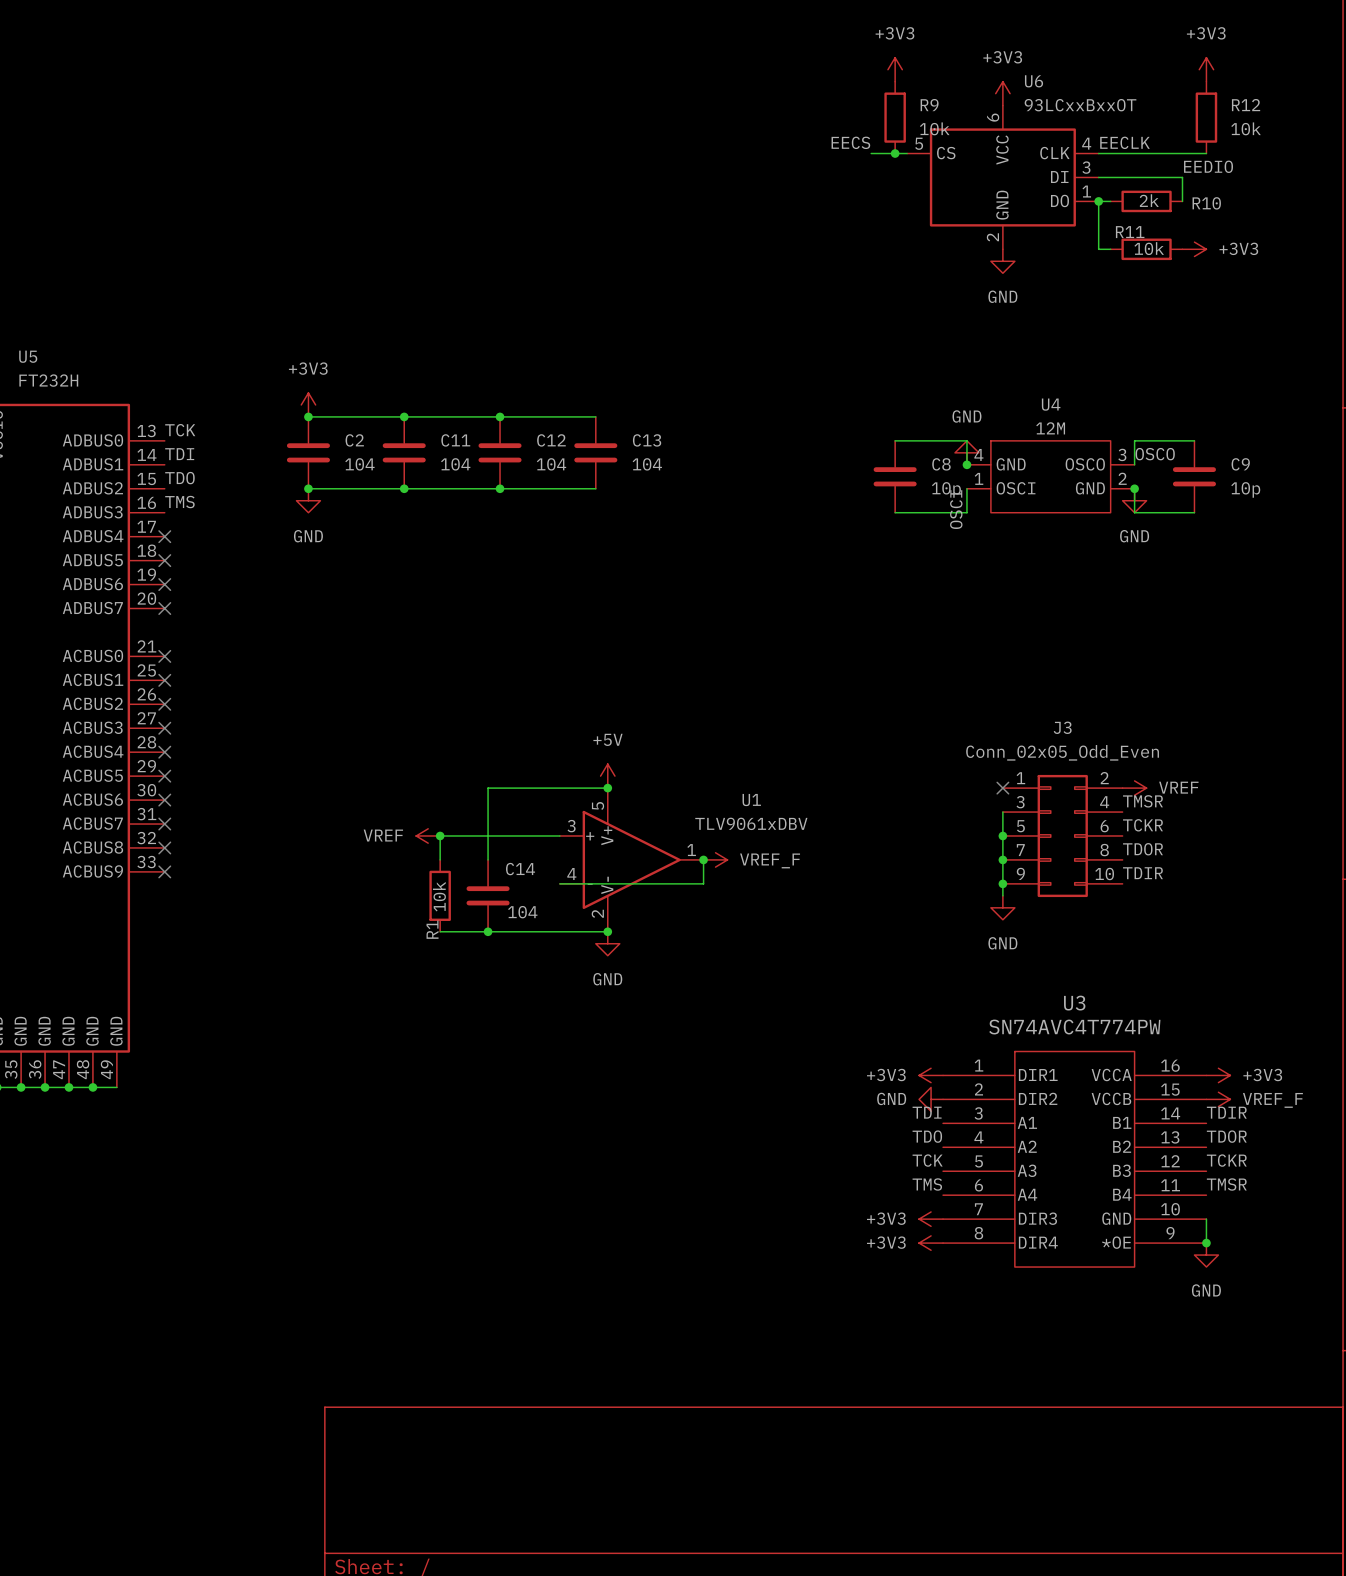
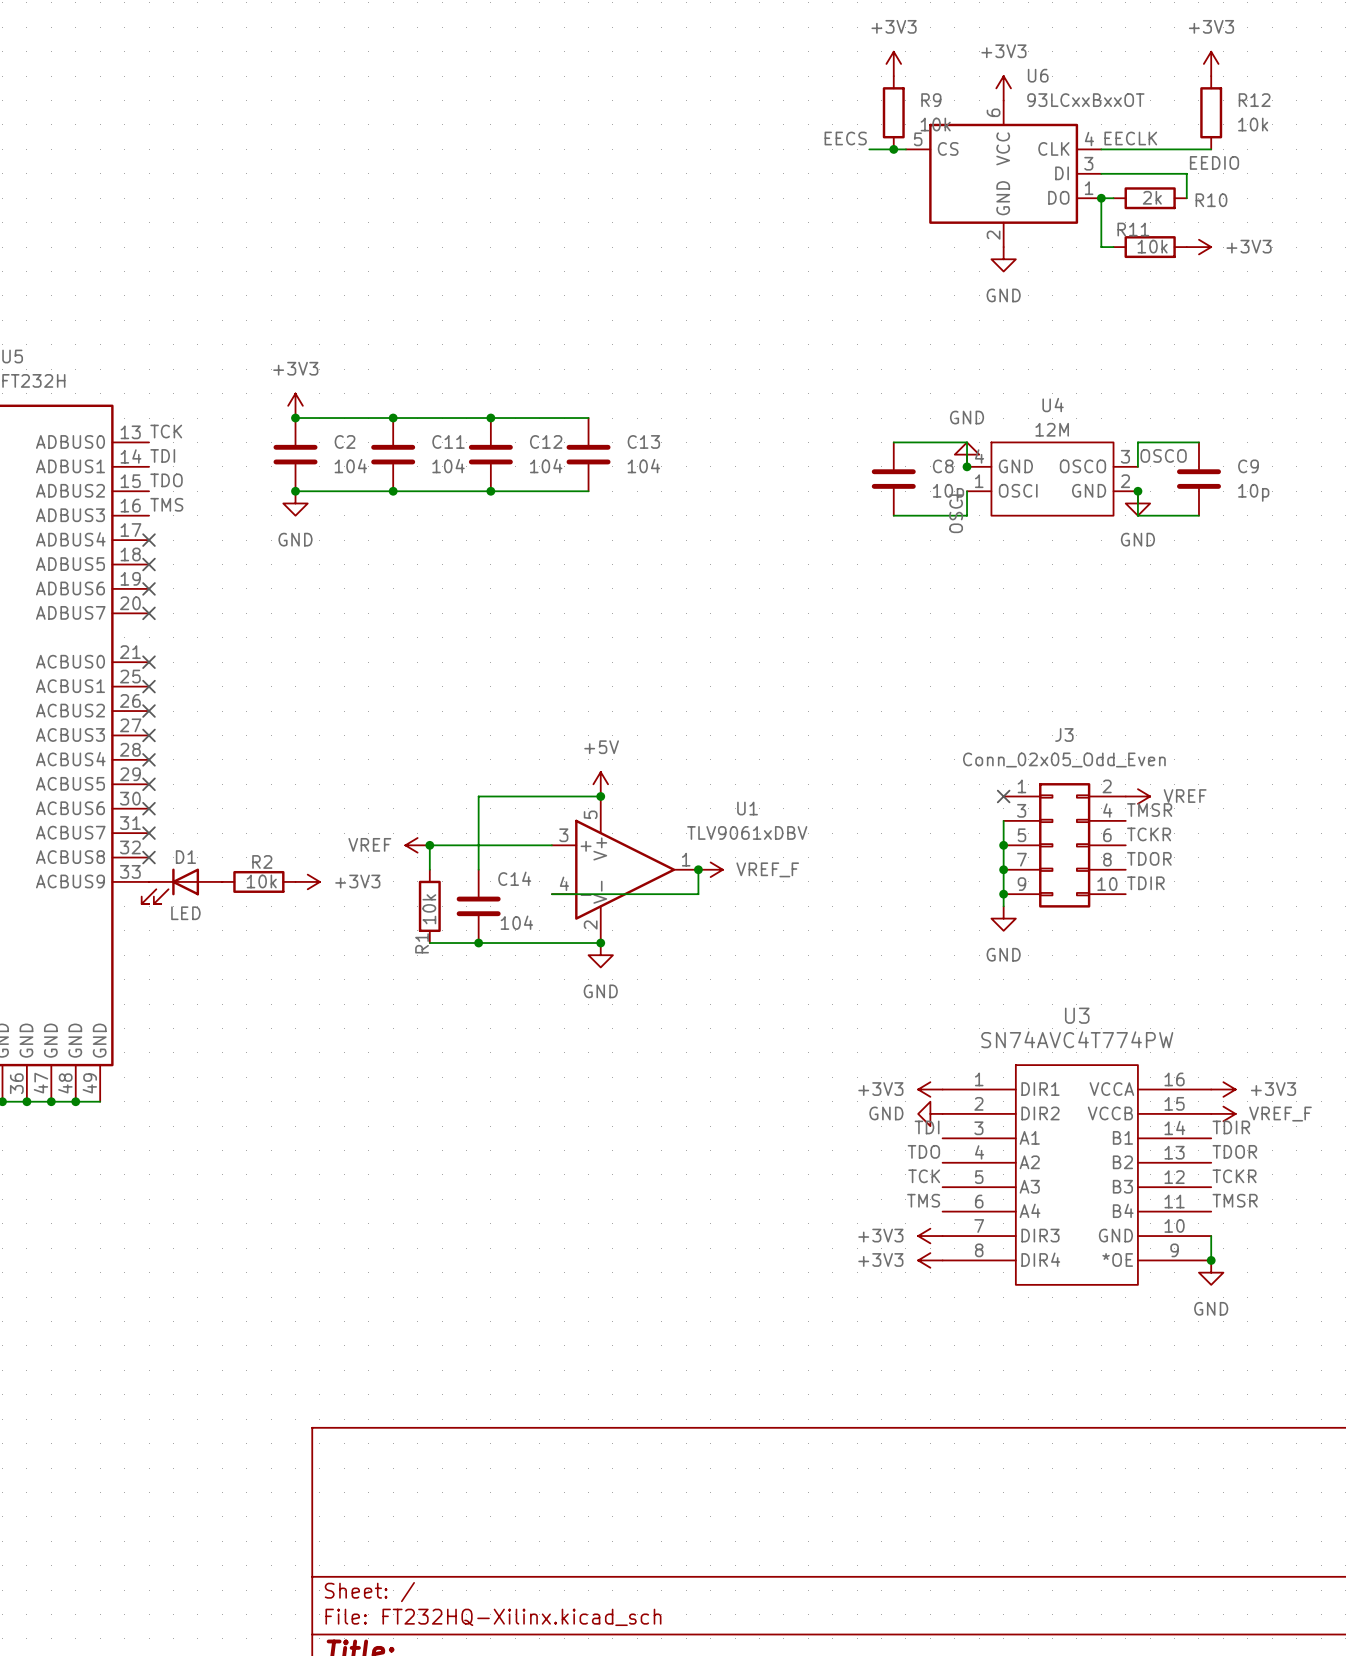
no-connect mark: (164, 871) -> none
R2: none -> 10k (258, 881)
power symbol: none -> +3V3 (307, 881)
D1: none -> LED (181, 886)

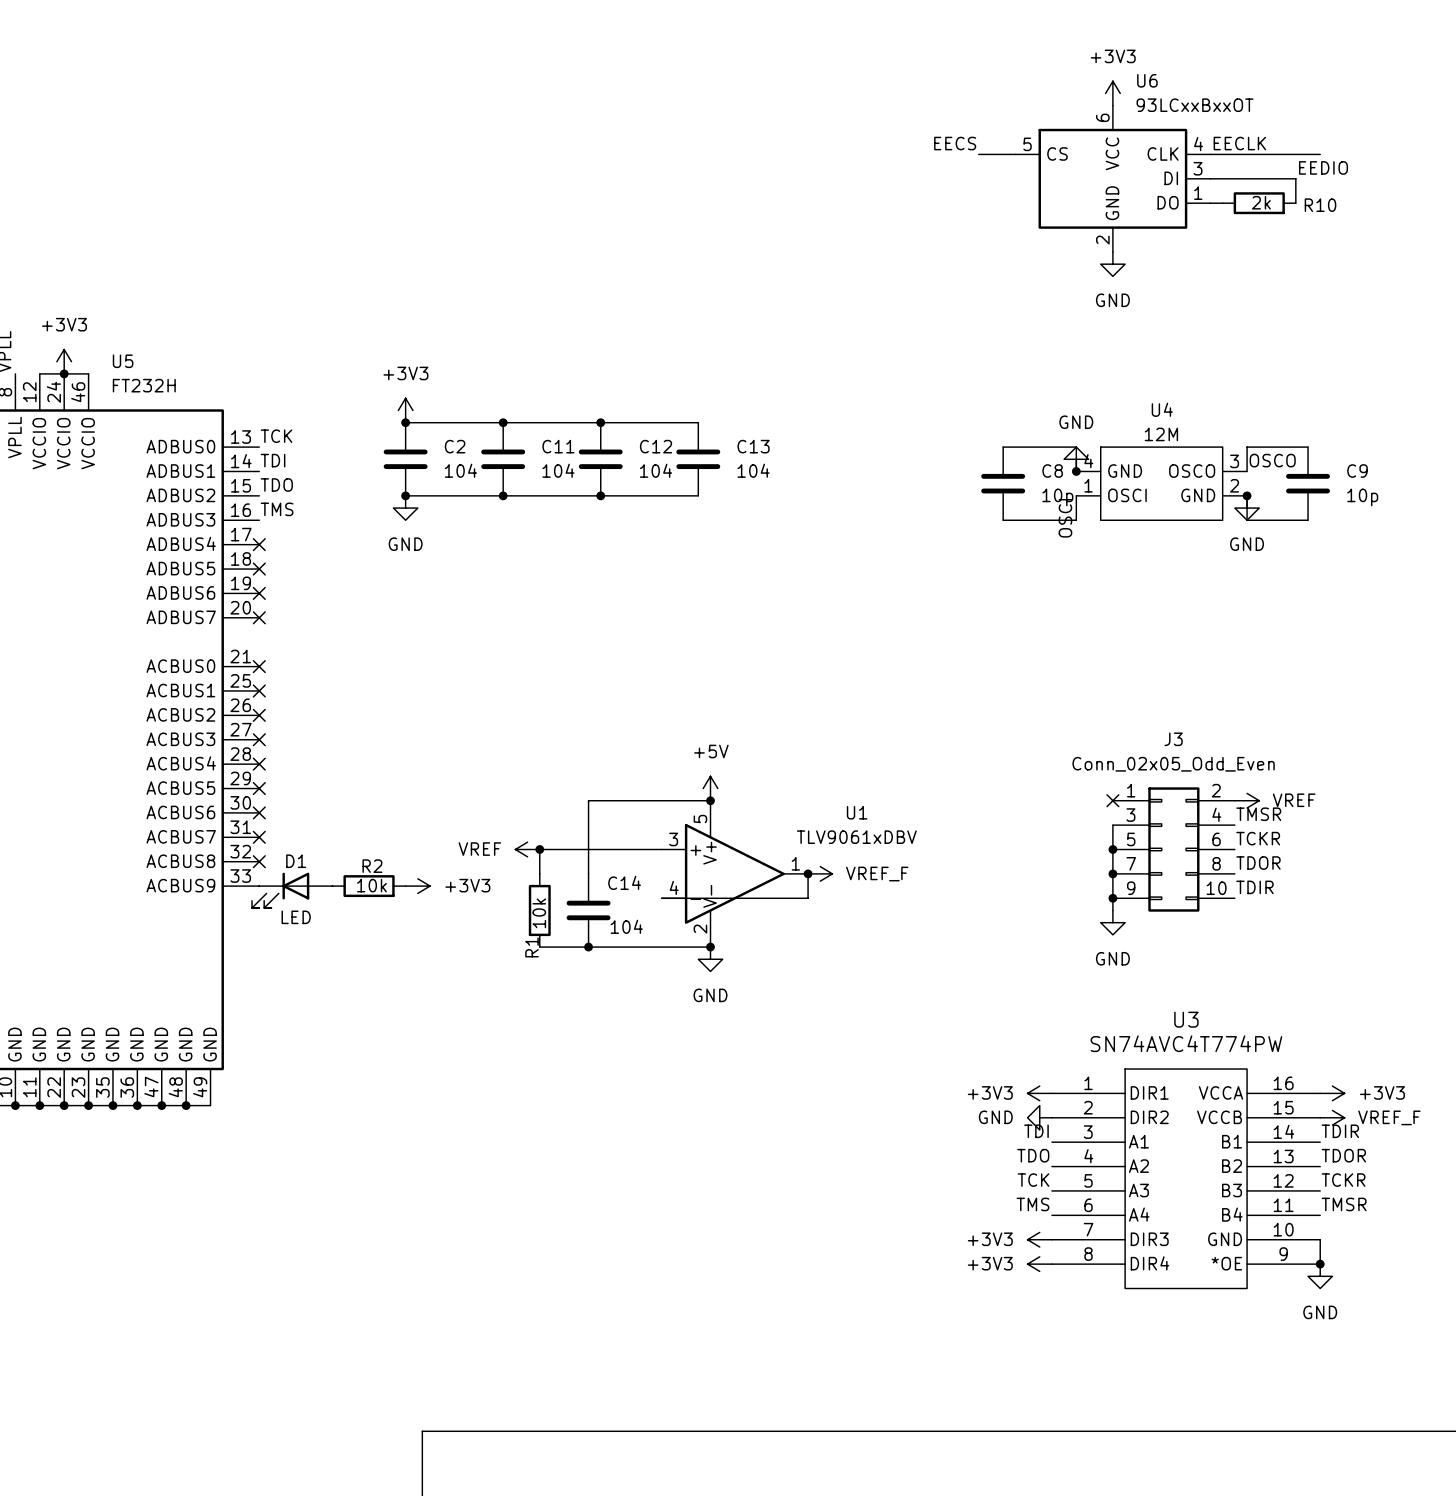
power symbol: +3V3 (893, 63) -> none
power symbol: +3V3 (1211, 63) -> none
R9: 10k (893, 112) -> none
R12: 10k (1211, 112) -> none
junction: (893, 149) -> none
wire: (1101, 198) (1101, 247) (1113, 247) -> none
junction: (1101, 198) -> none
R11: 10k (1150, 247) -> none
power symbol: +3V3 (1198, 247) -> none

